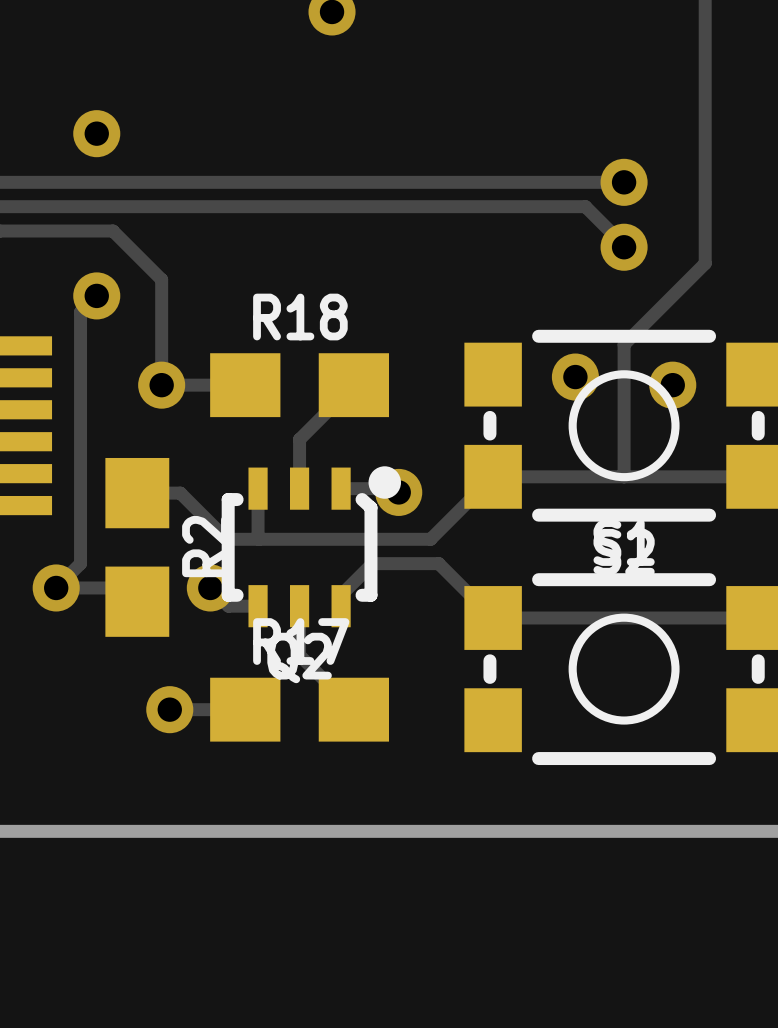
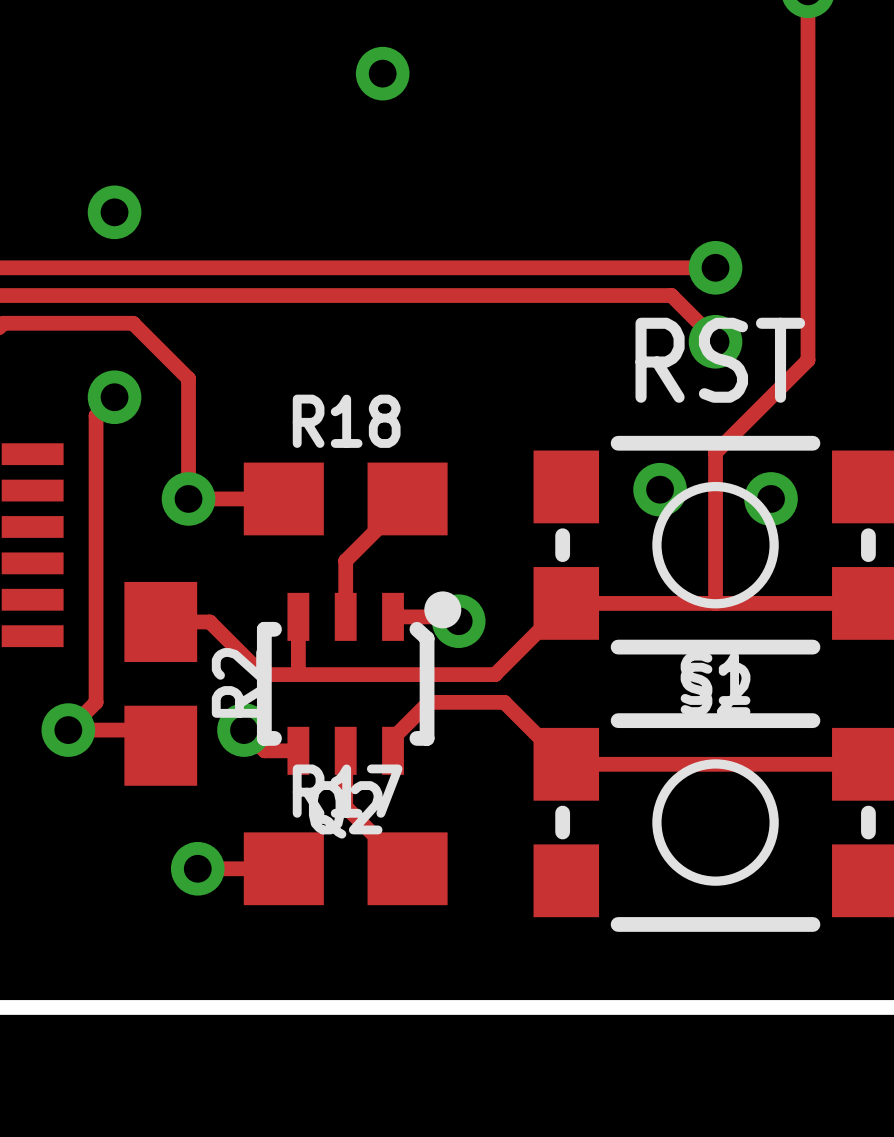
text: none -> RST (720, 360)

